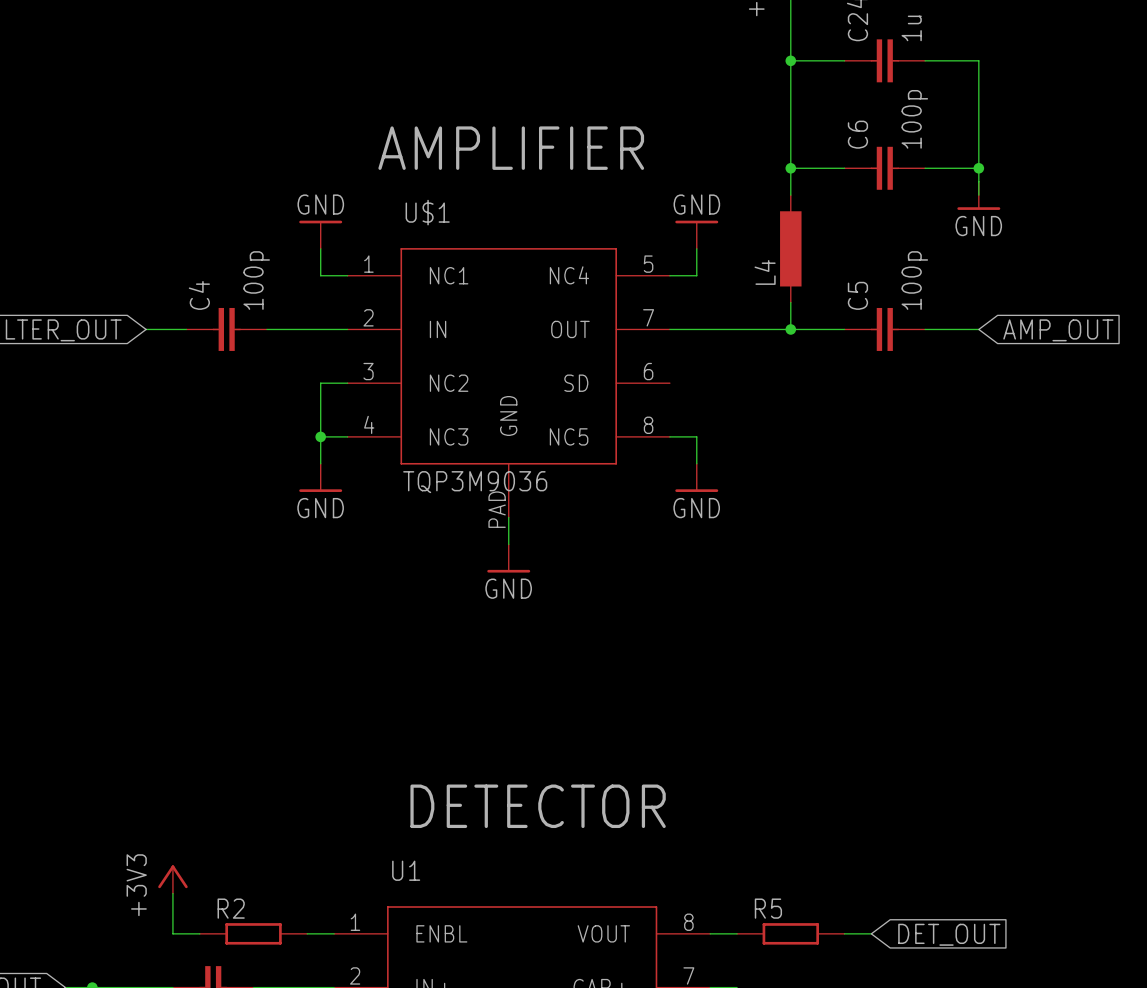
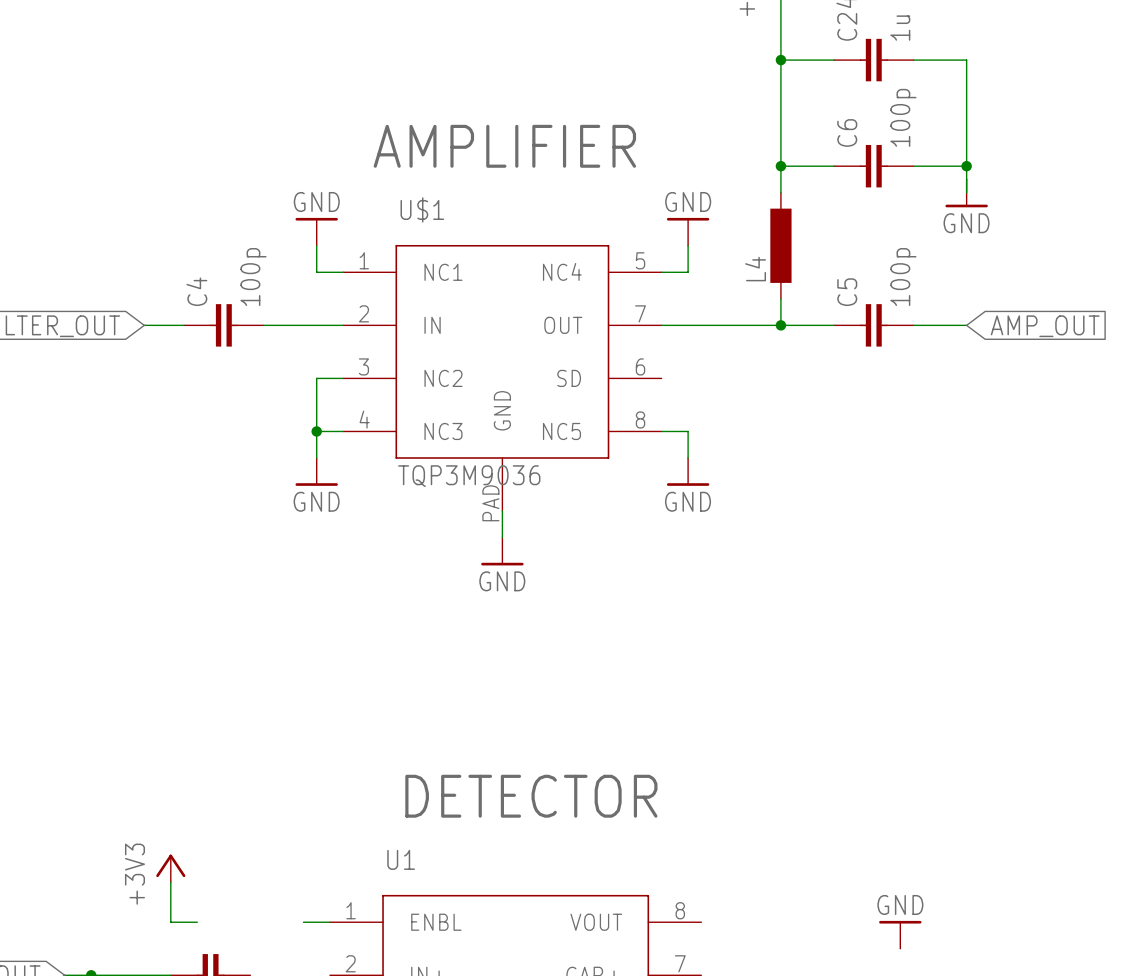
R2: (253, 933) -> none
wire: (710, 933) (737, 933) -> none
R5: (790, 933) -> none
wire: (844, 933) (871, 933) -> none
global label: DET_OUT (949, 934) -> none
power symbol: none -> GND (900, 934)
wire: (253, 987) (334, 987) -> none
wire: (710, 987) (737, 987) -> none

